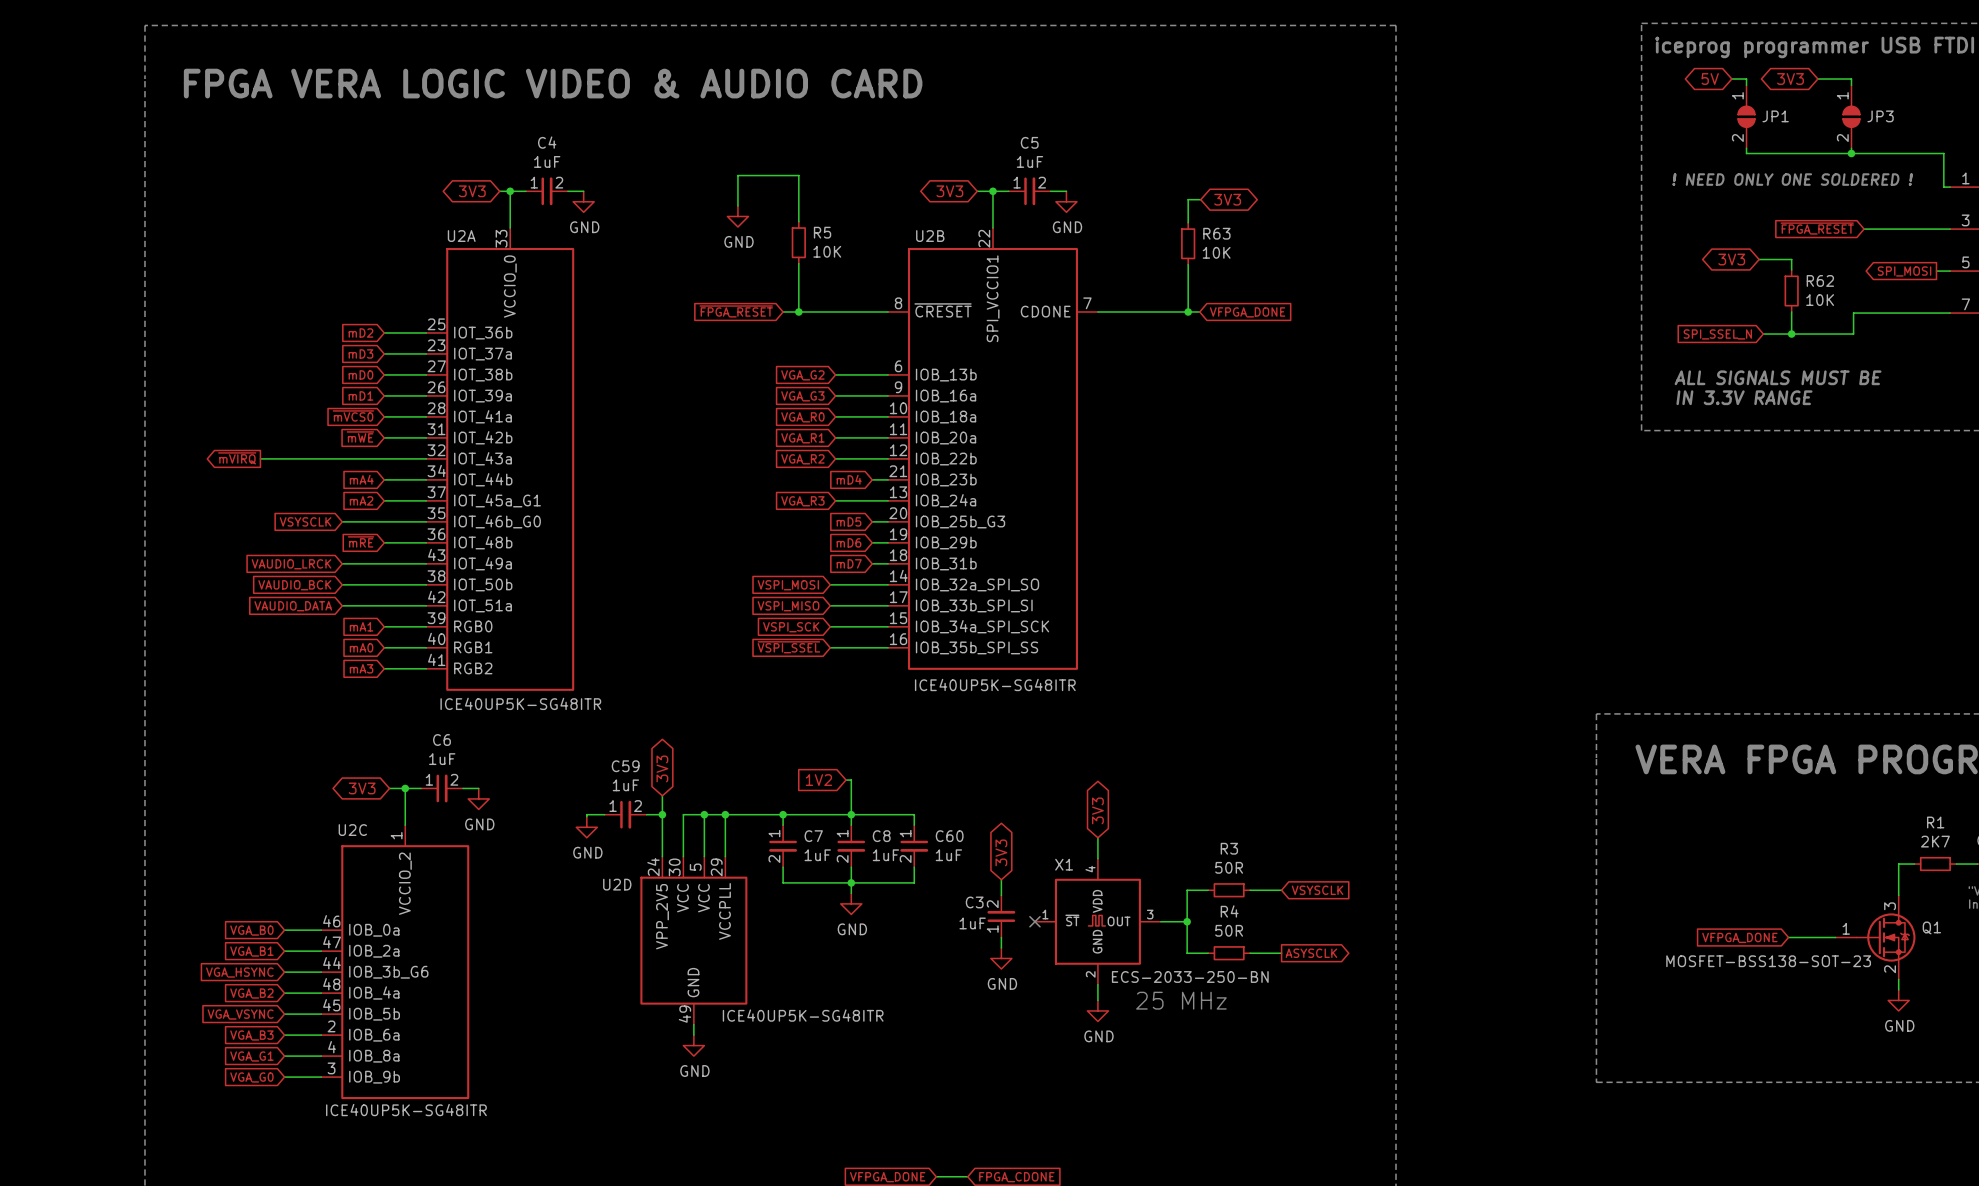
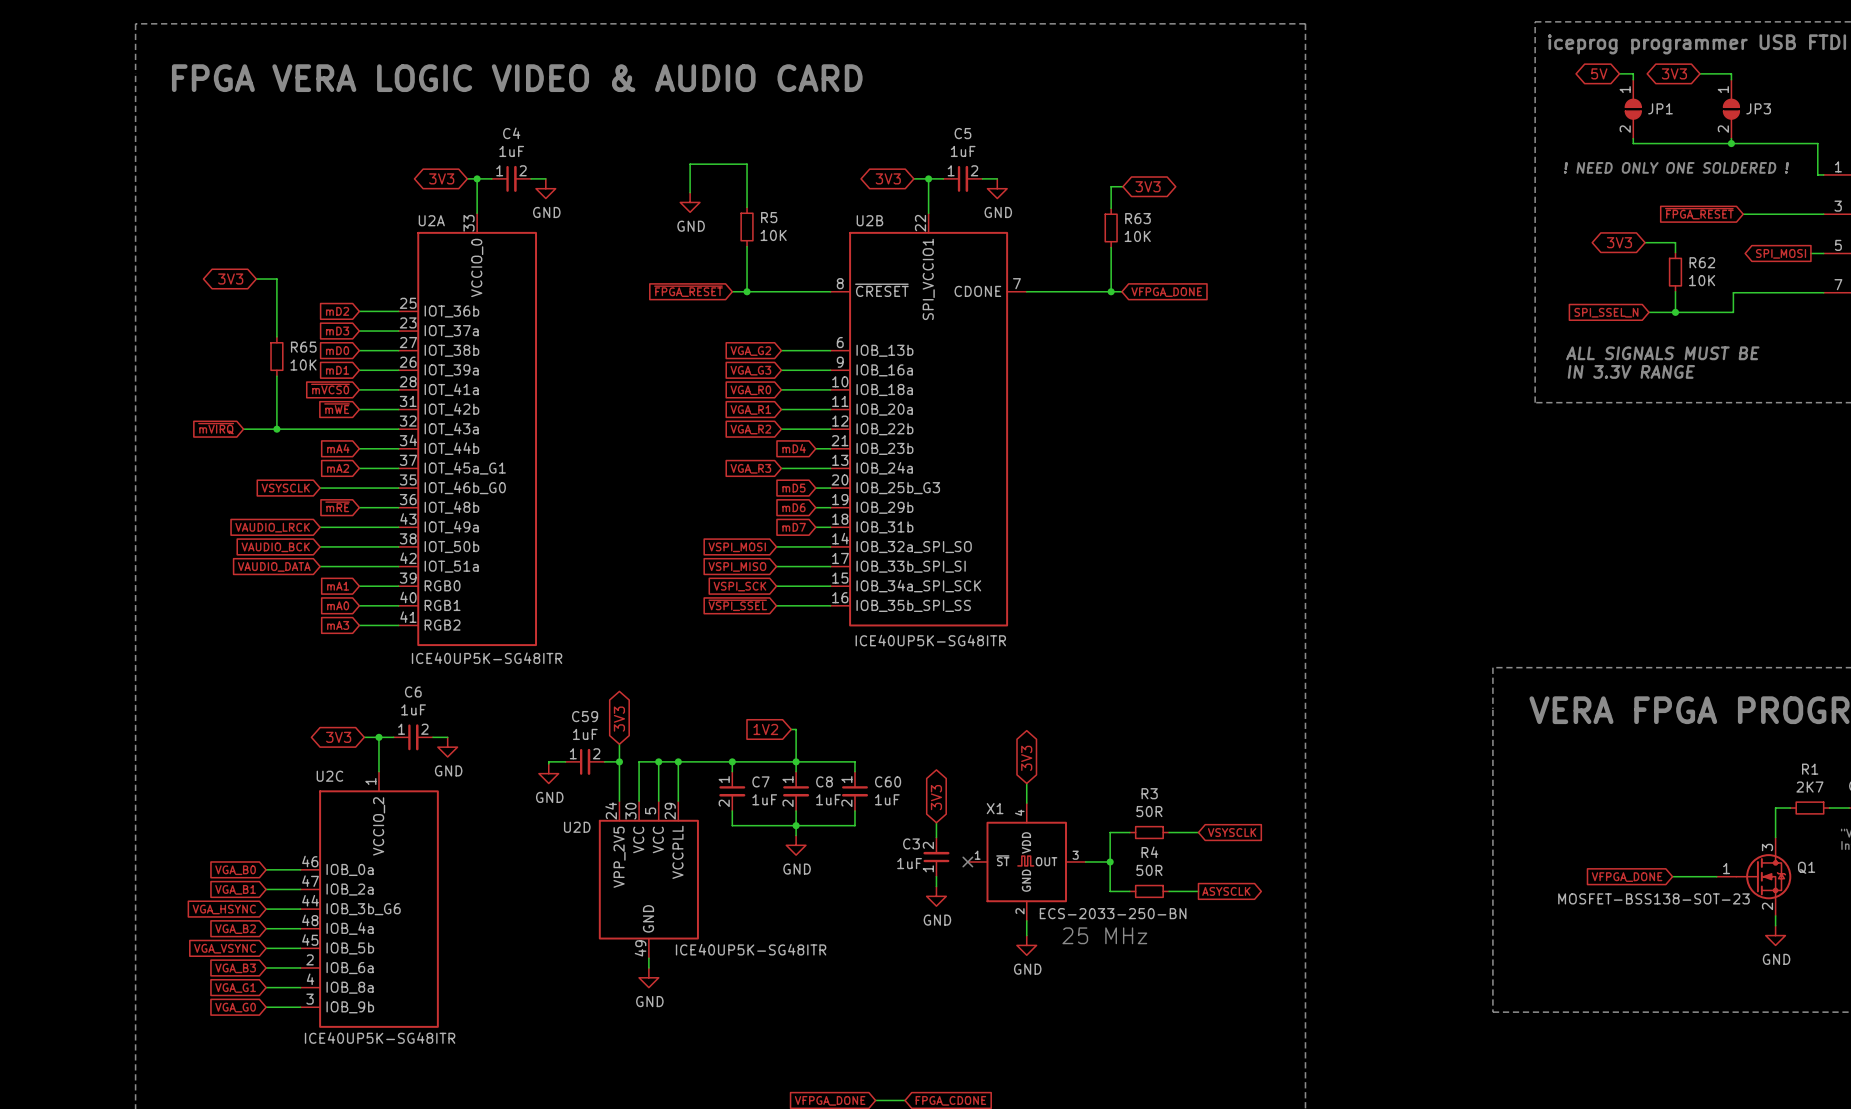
global label: none -> 3V3 (230, 279)
wire: none -> (256, 279) (276, 279) (276, 336)
R65: none -> 10K (276, 356)
wire: none -> (276, 376) (276, 429)
global label shape: output (237, 458) -> input (216, 428)
junction: none -> (276, 429)

